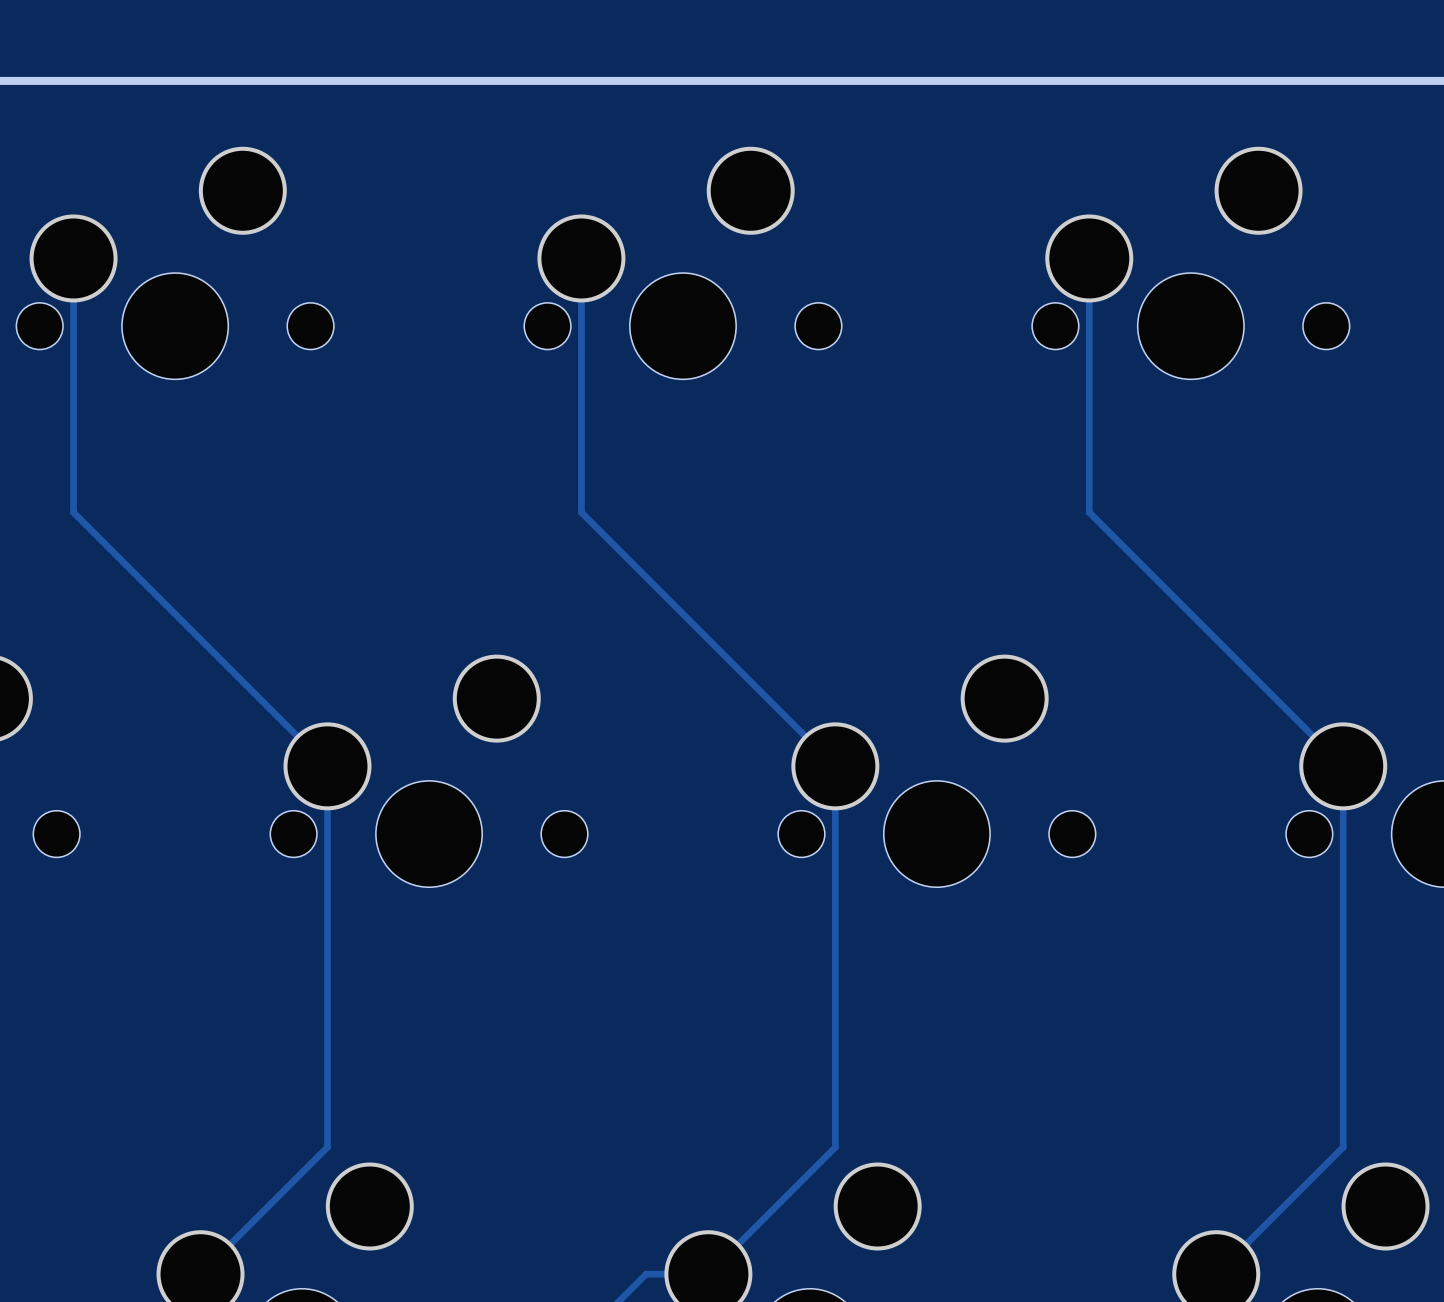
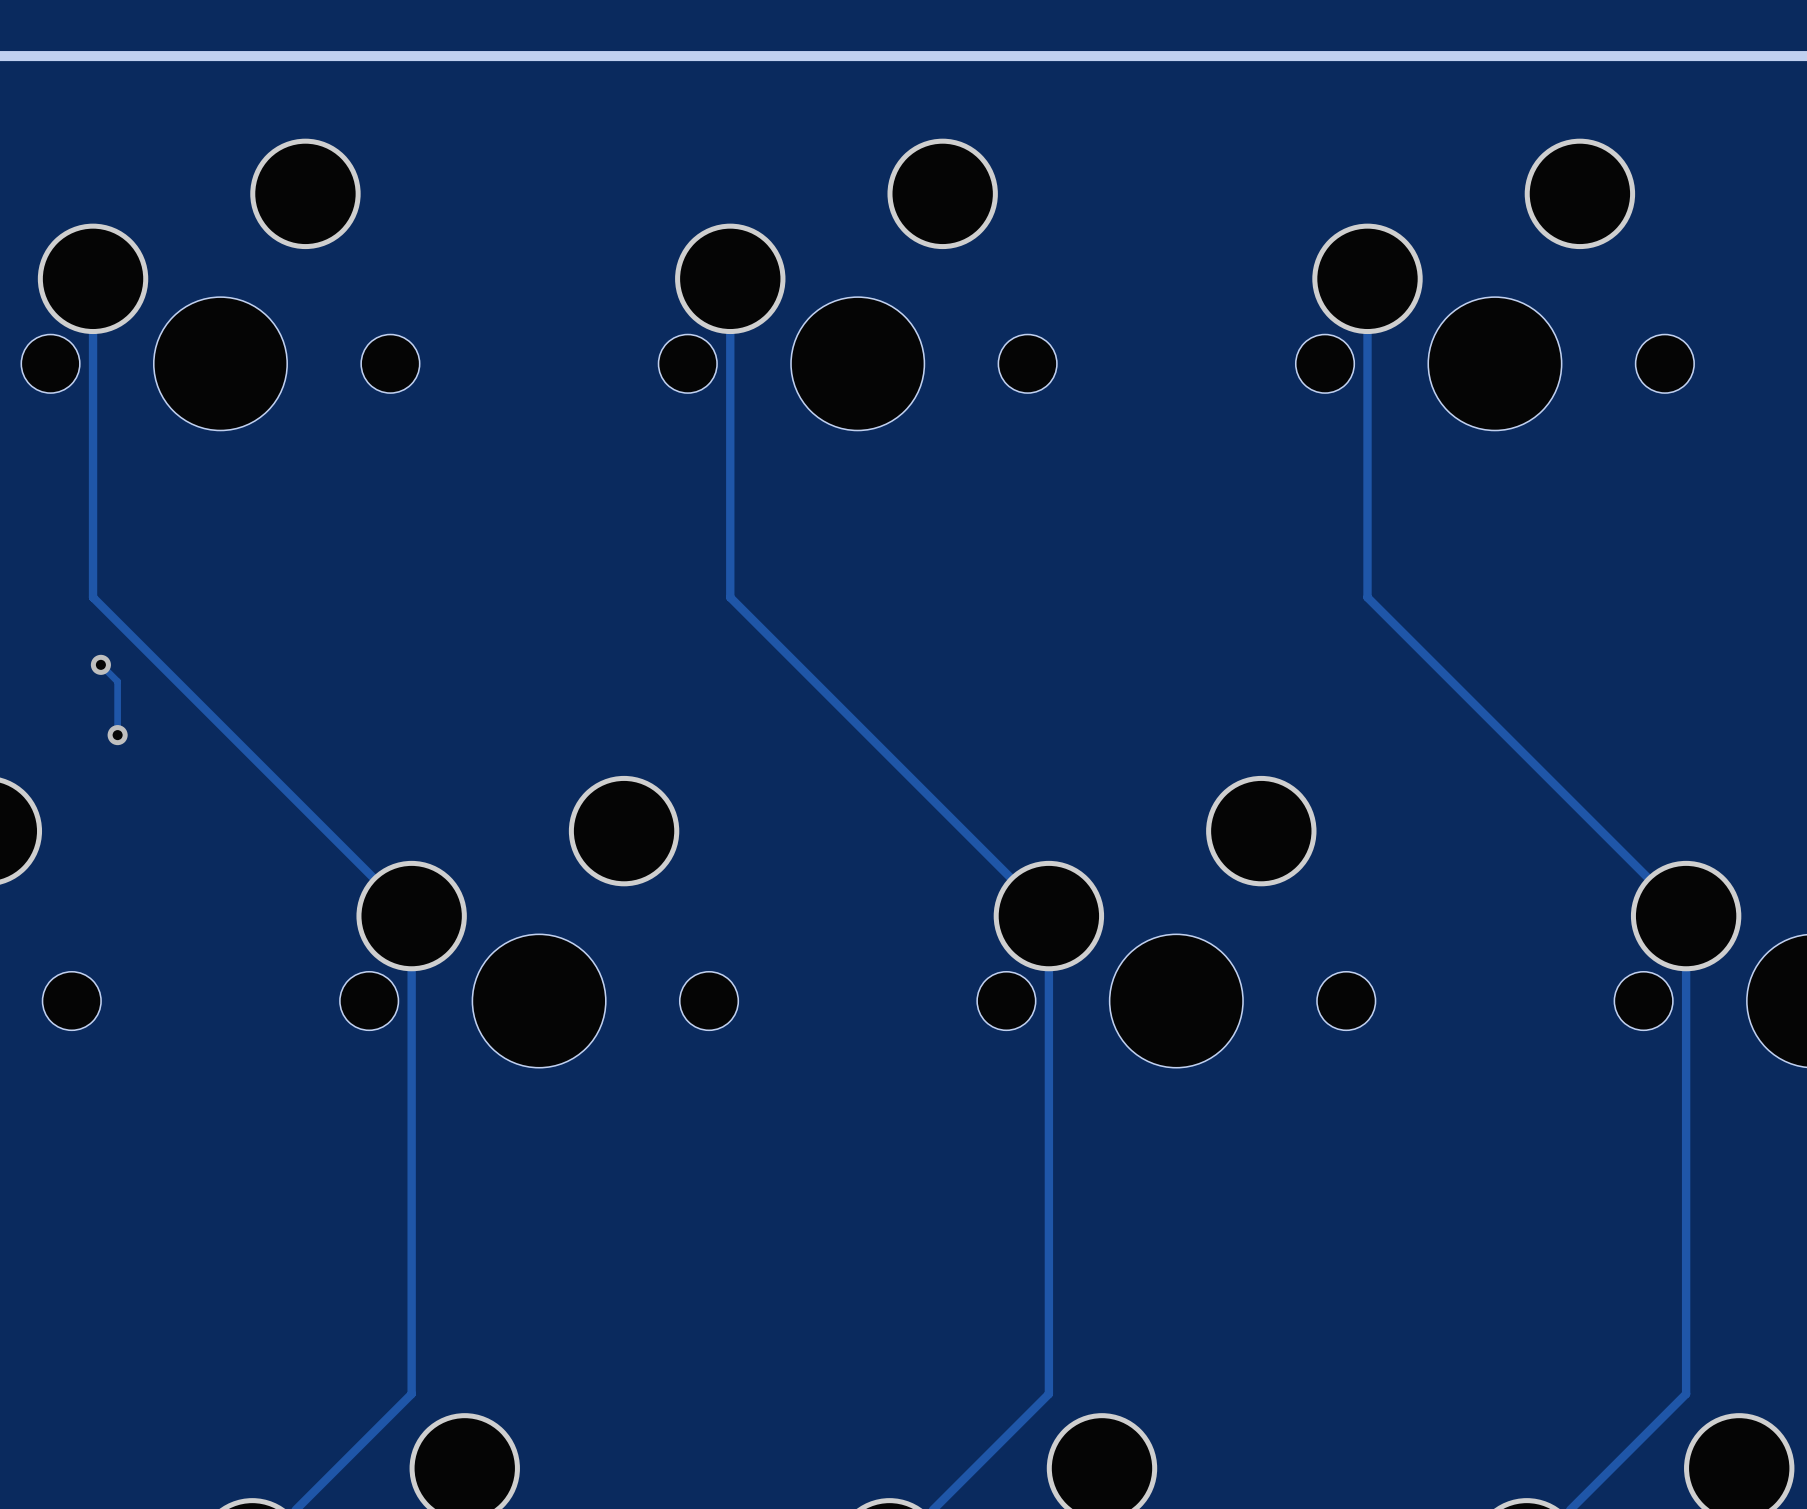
track: none -> (100, 664) (117, 681) (117, 735)
via: none -> (100, 664)
via: none -> (117, 735)

